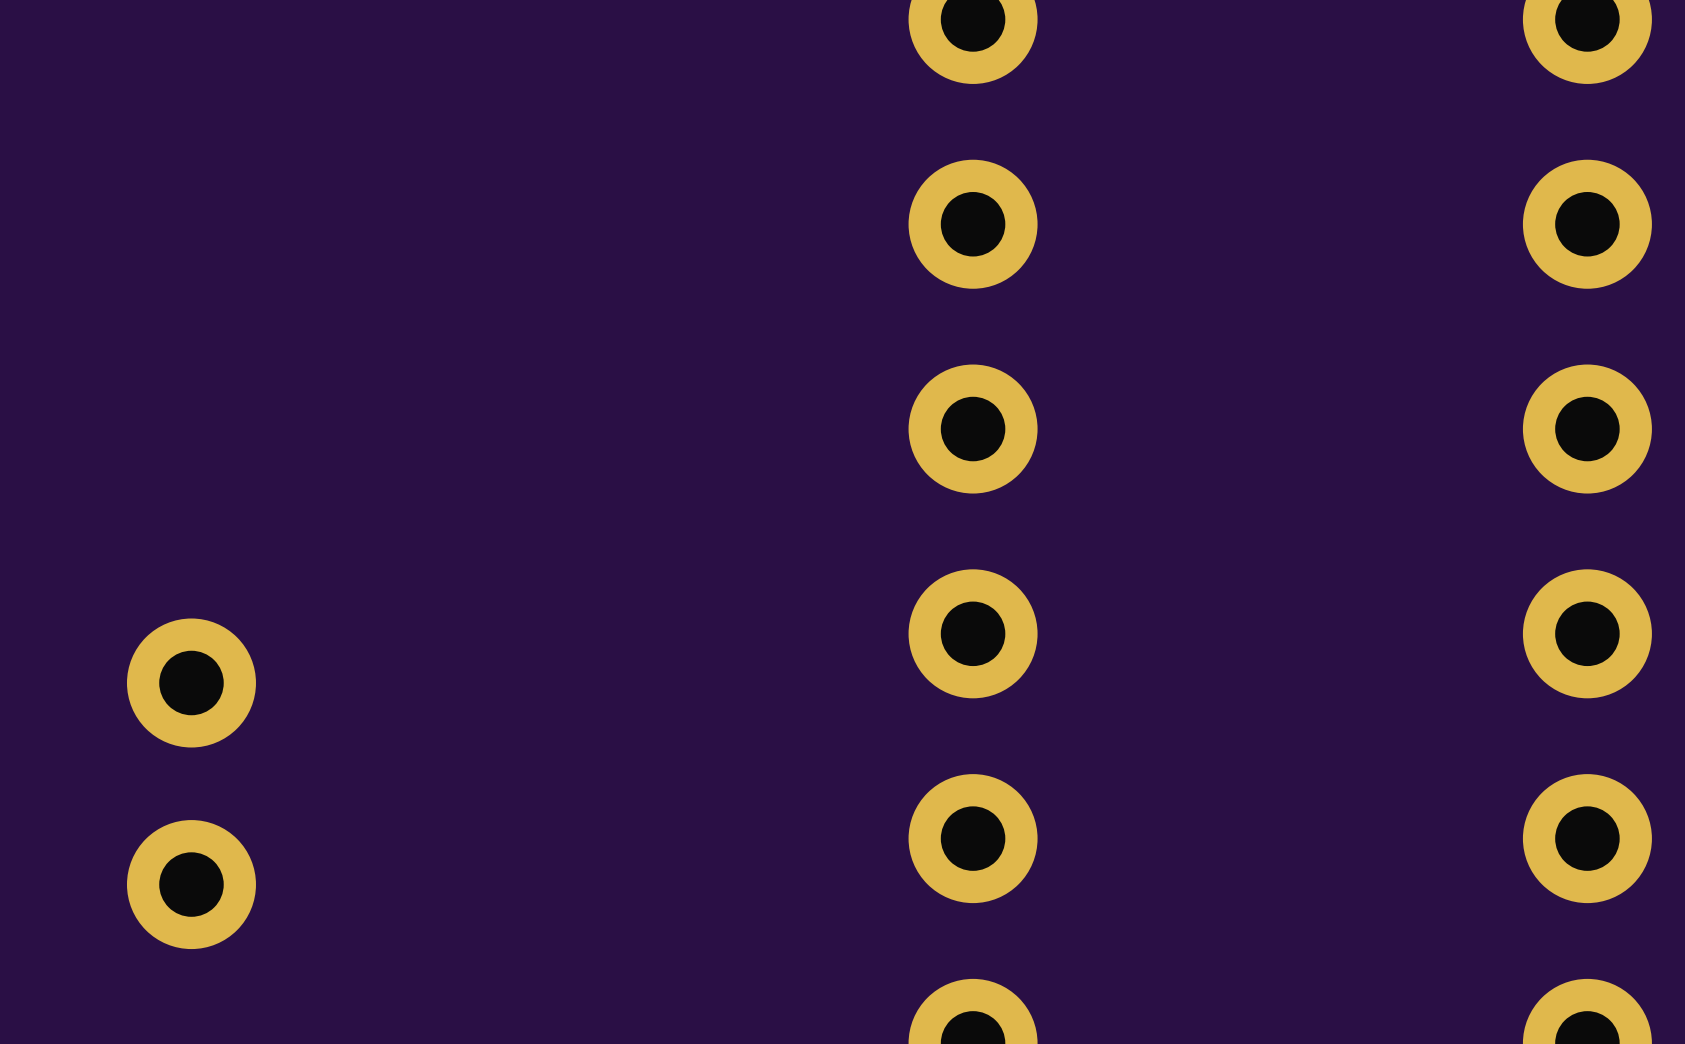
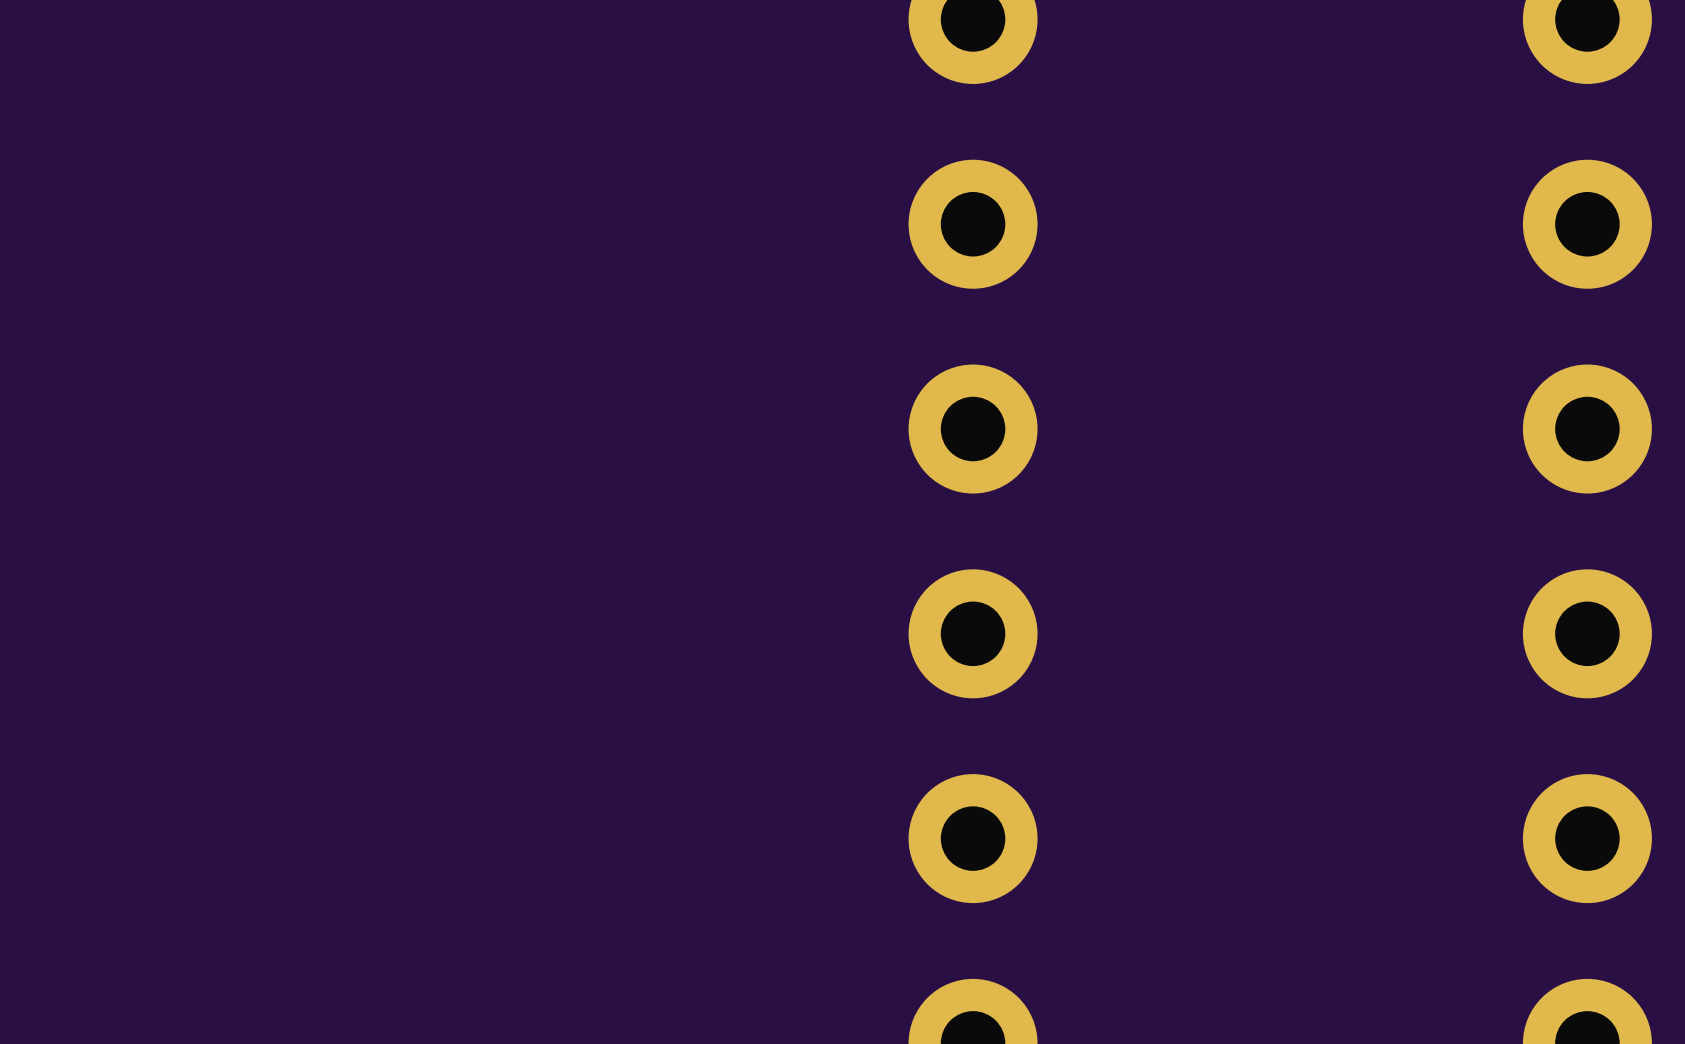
part: (191, 783) -> none

